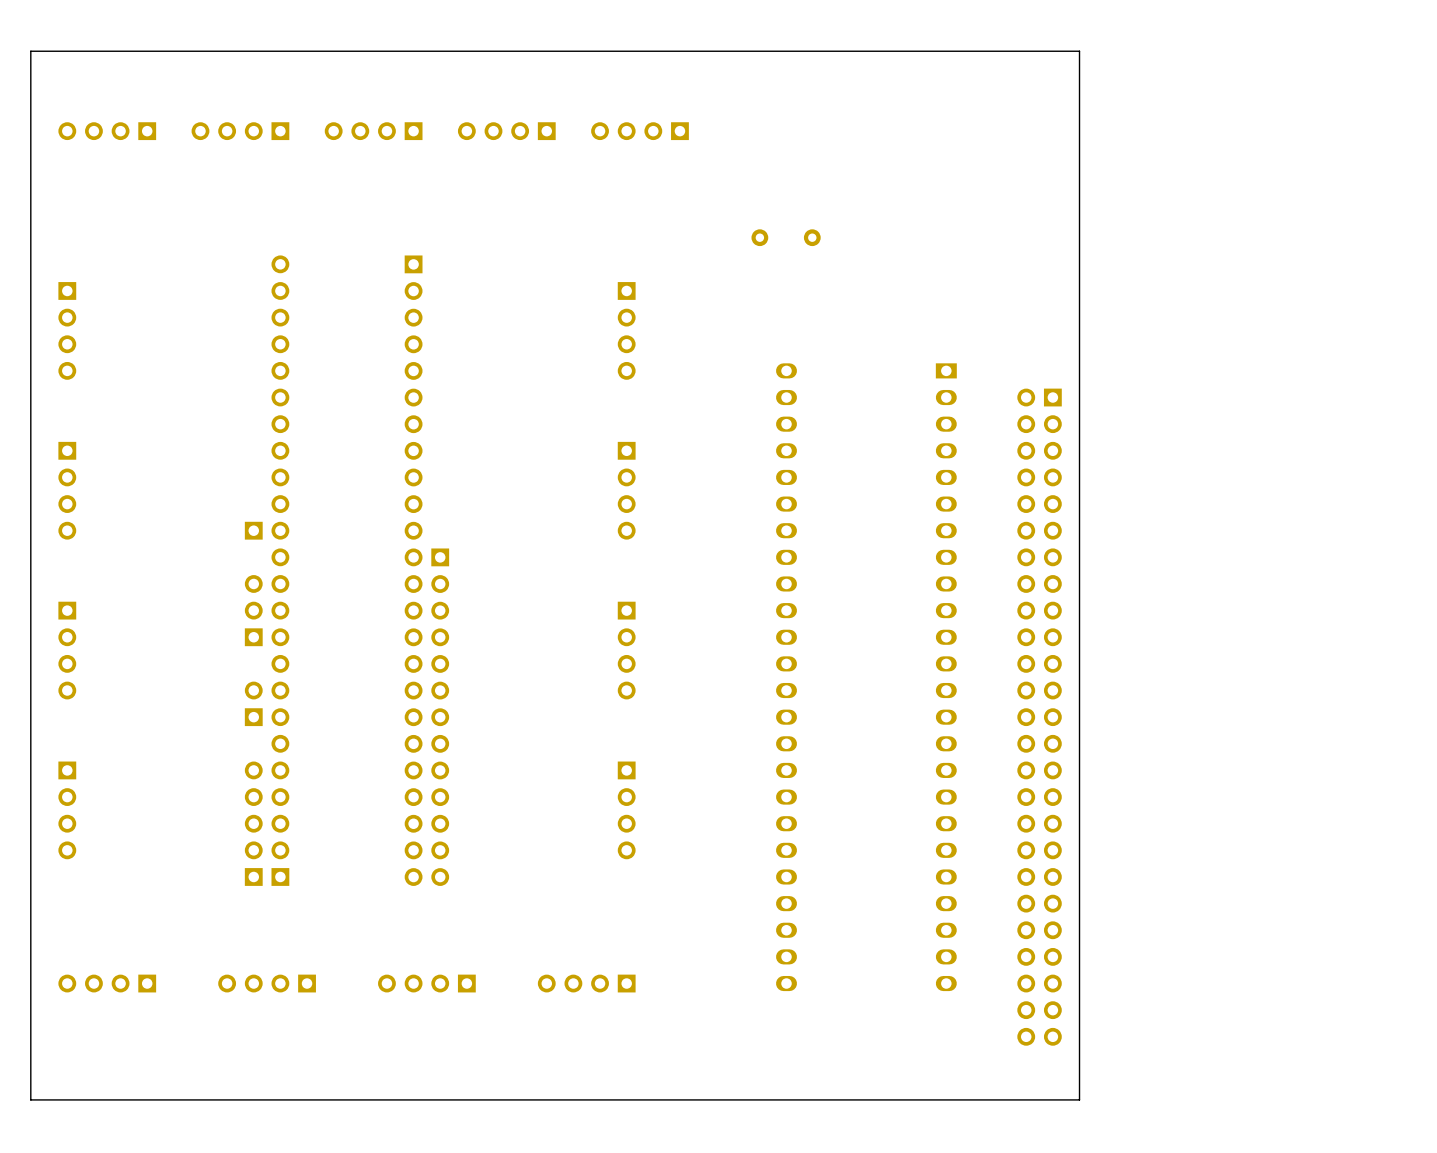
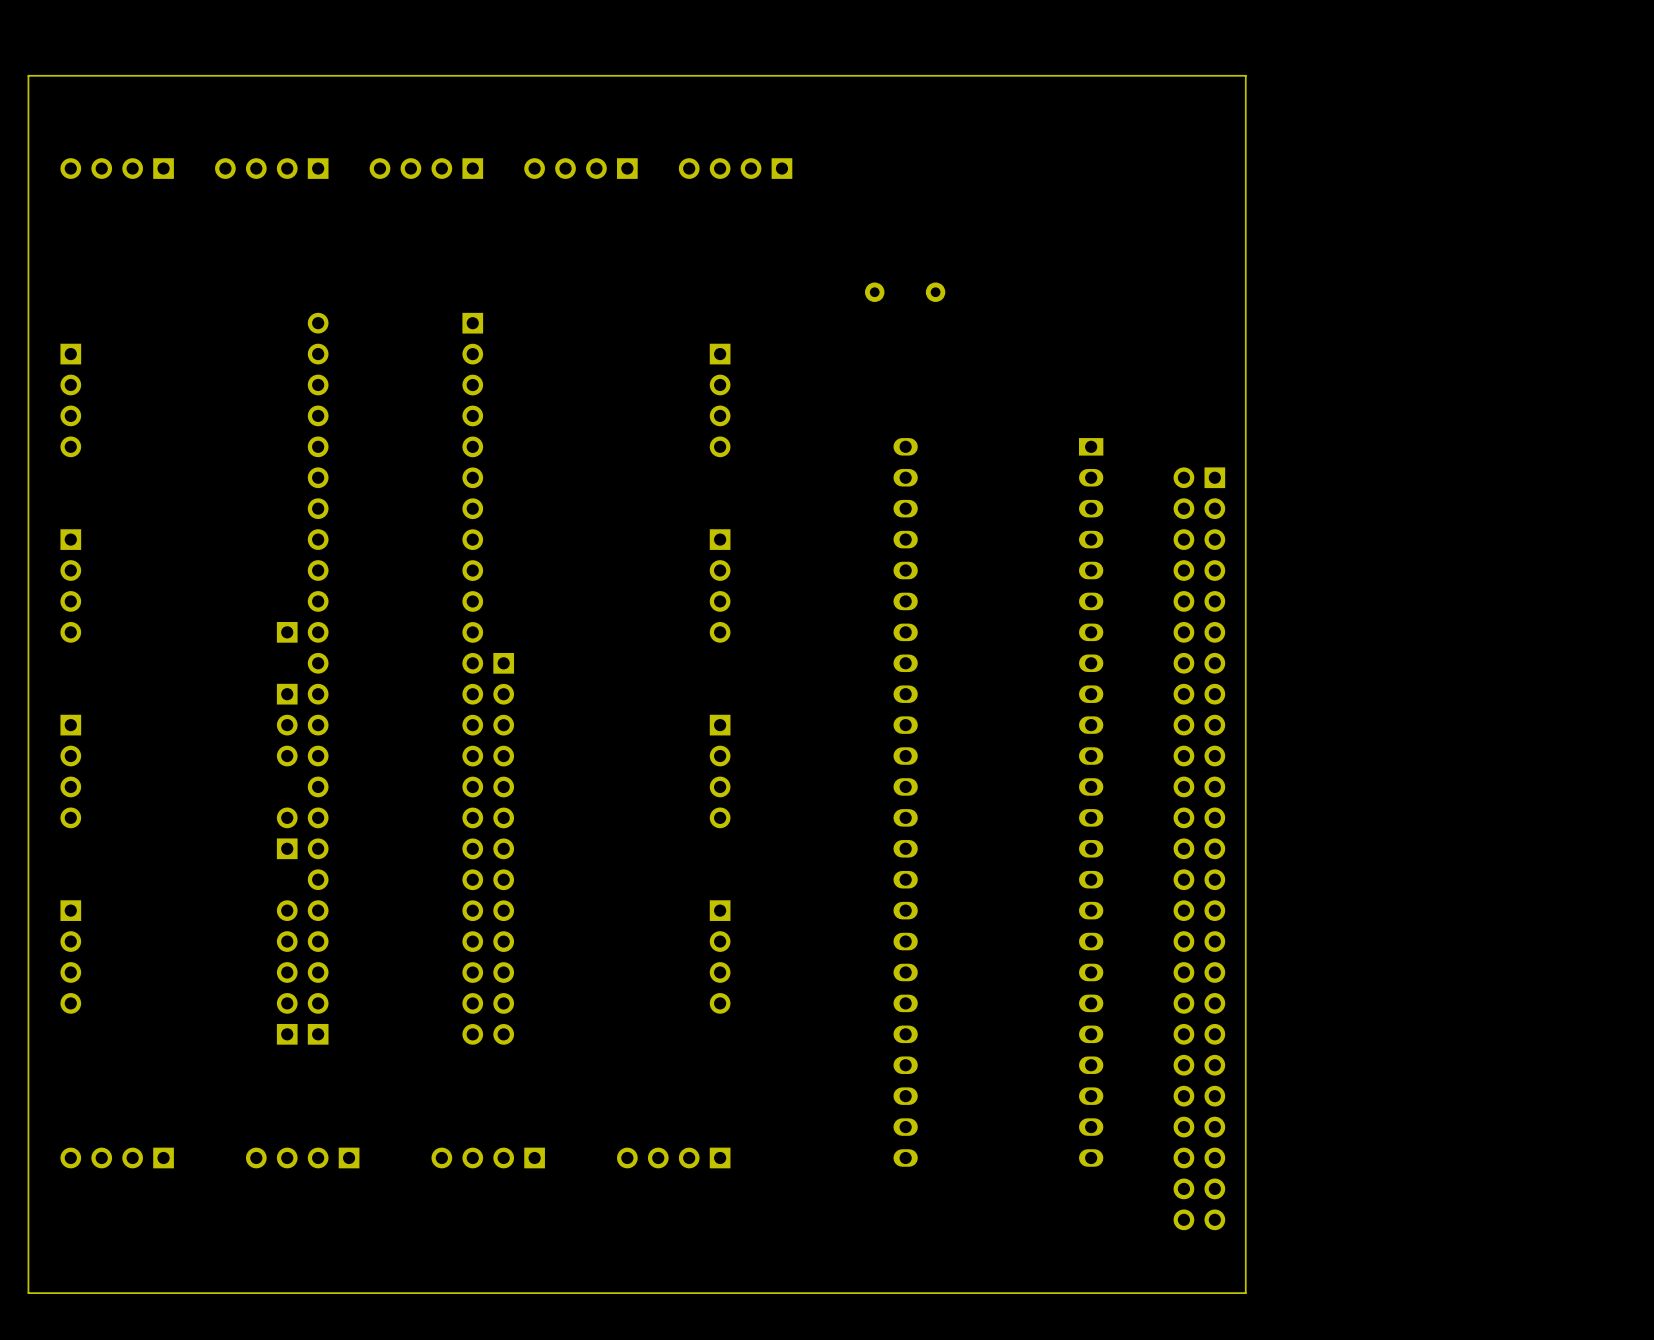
part rotation: 0° (253, 610) -> 180° (287, 725)

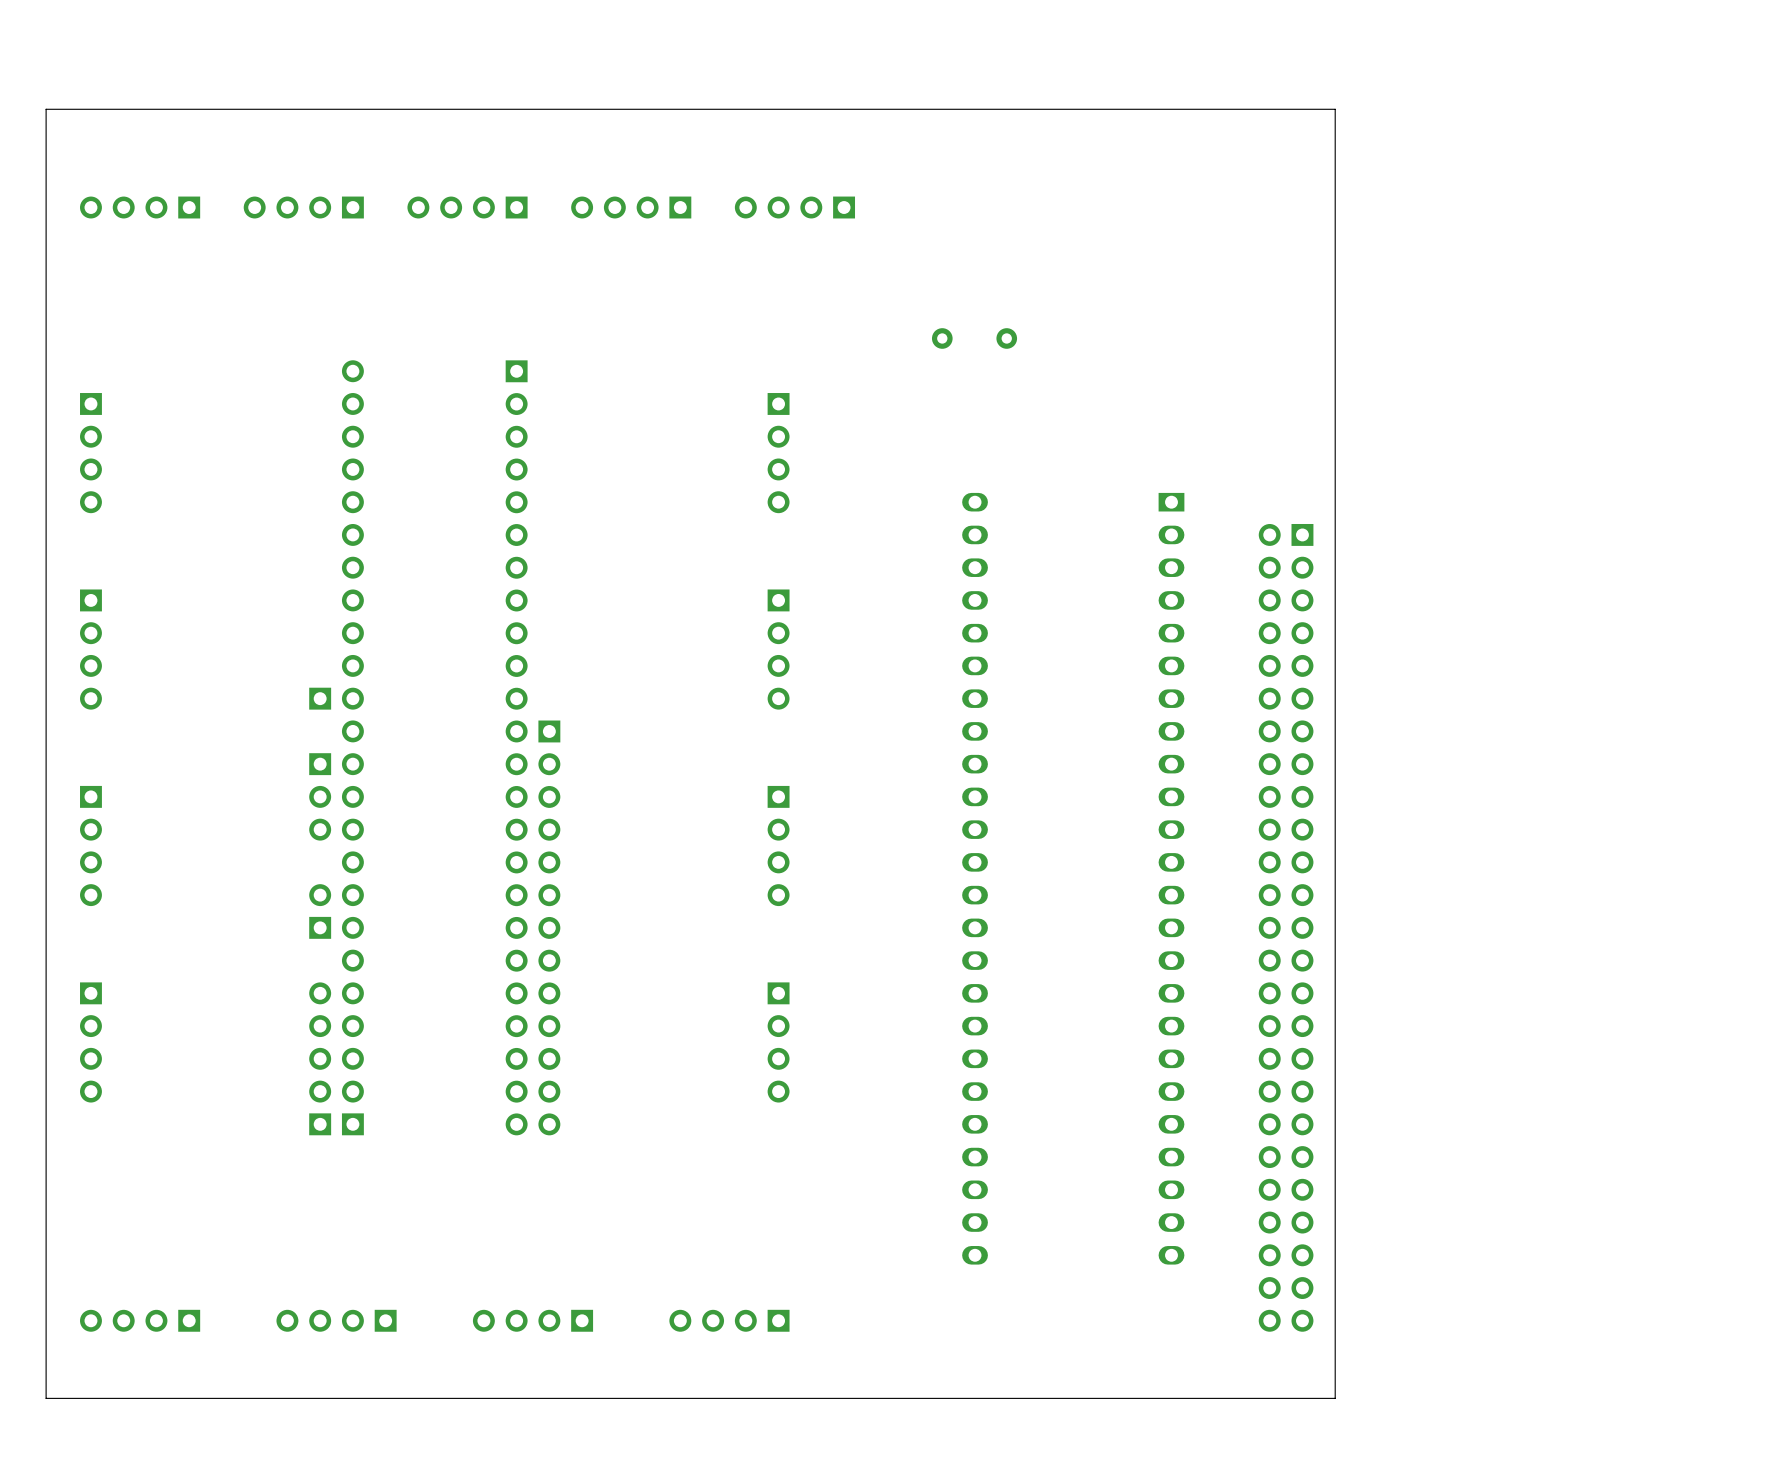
part position: (117, 1157) -> (140, 1320)
part position: (302, 1157) -> (336, 1320)
part position: (488, 1157) -> (533, 1320)
part position: (673, 1157) -> (729, 1320)

